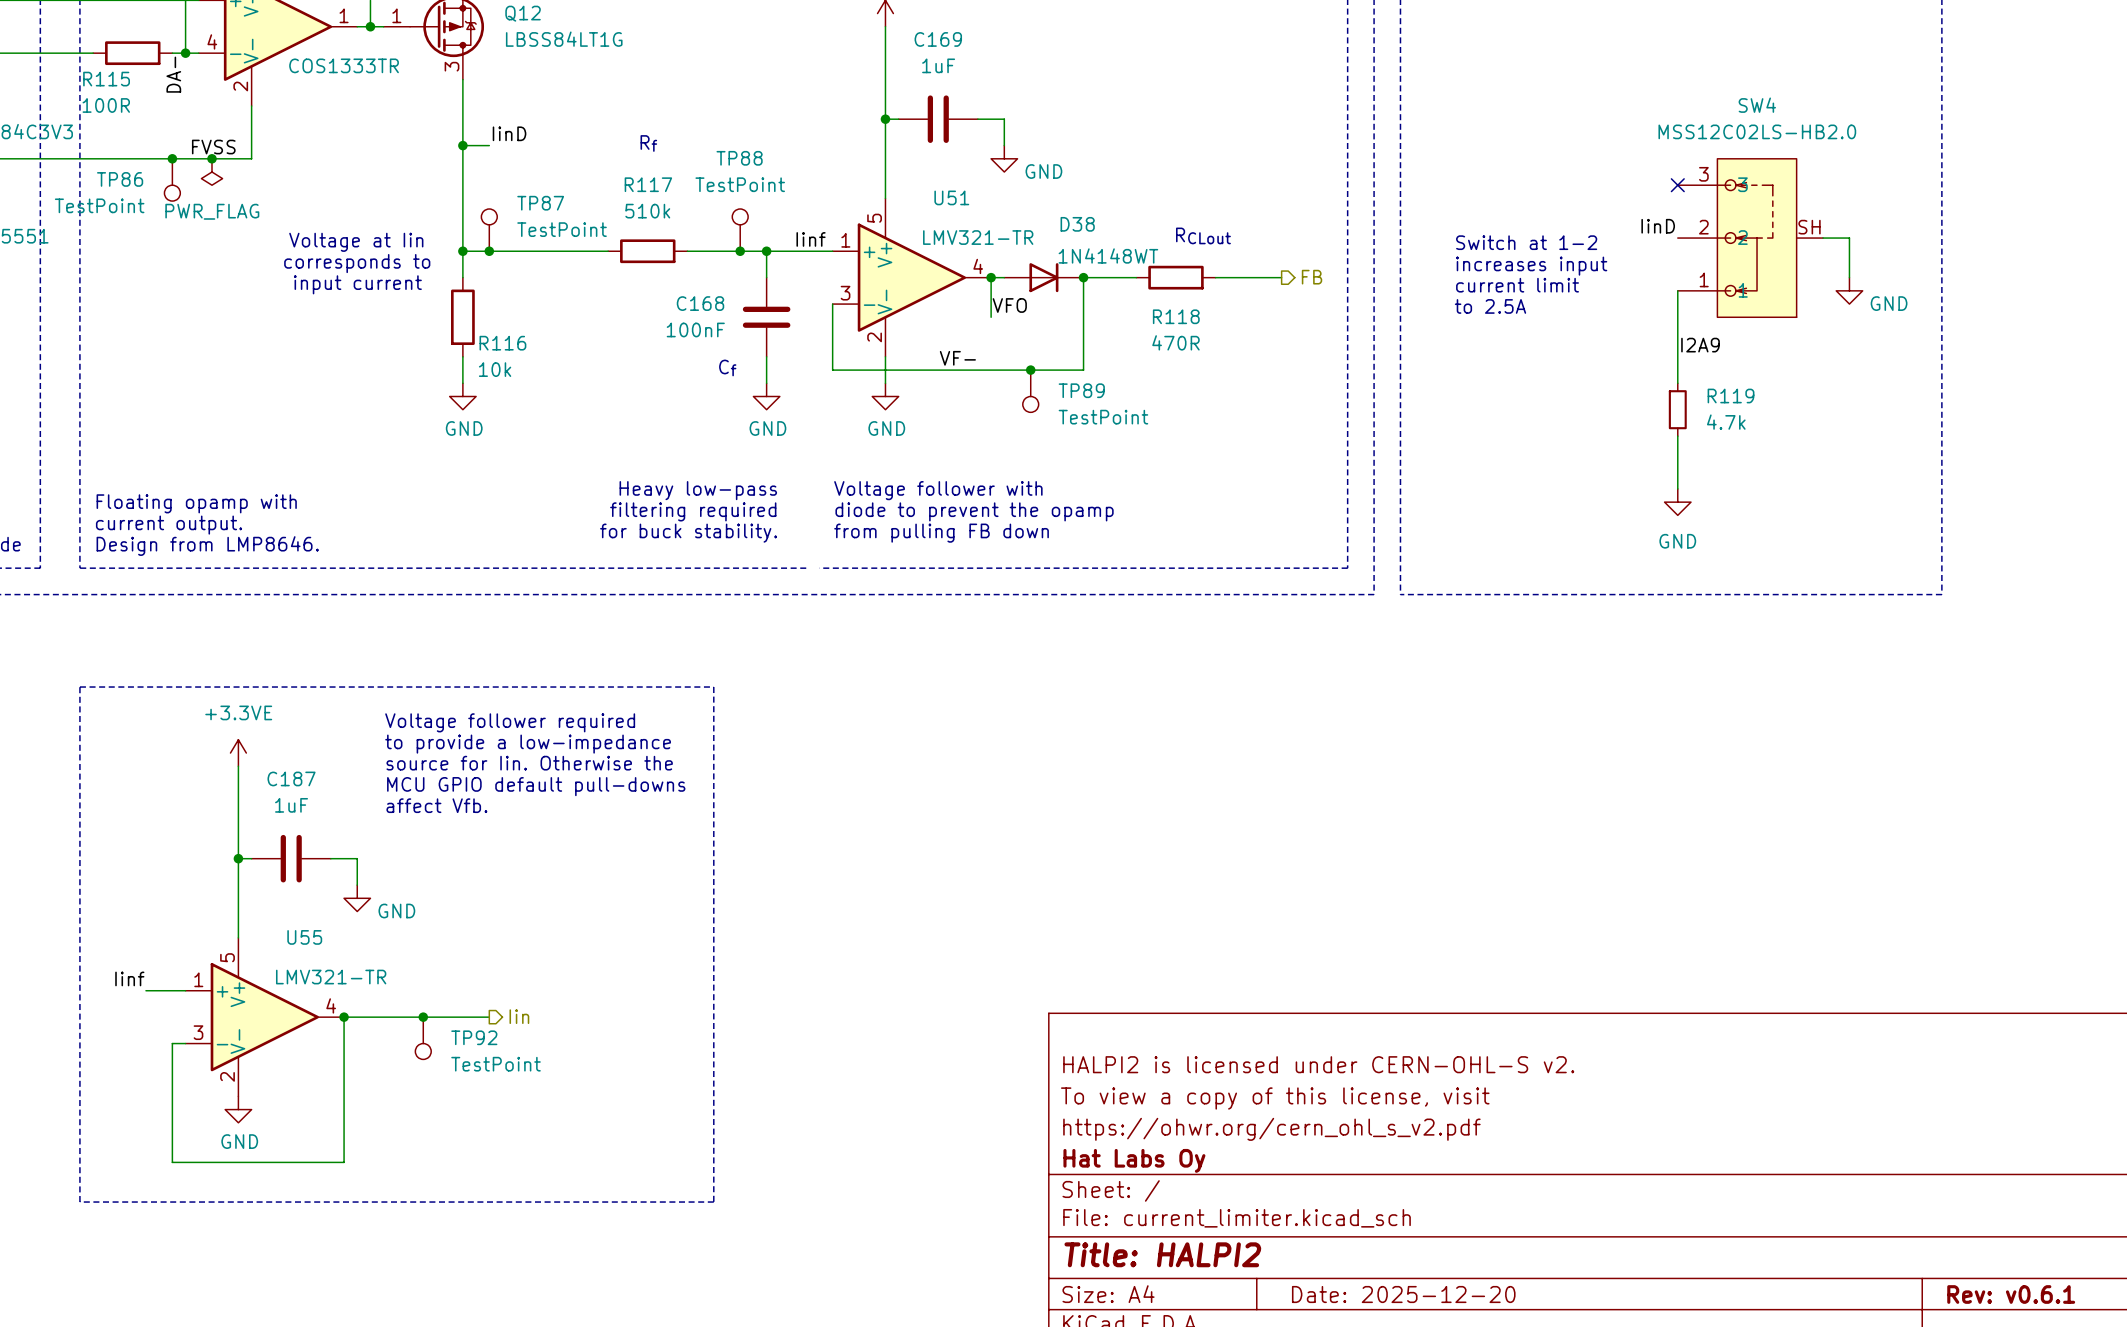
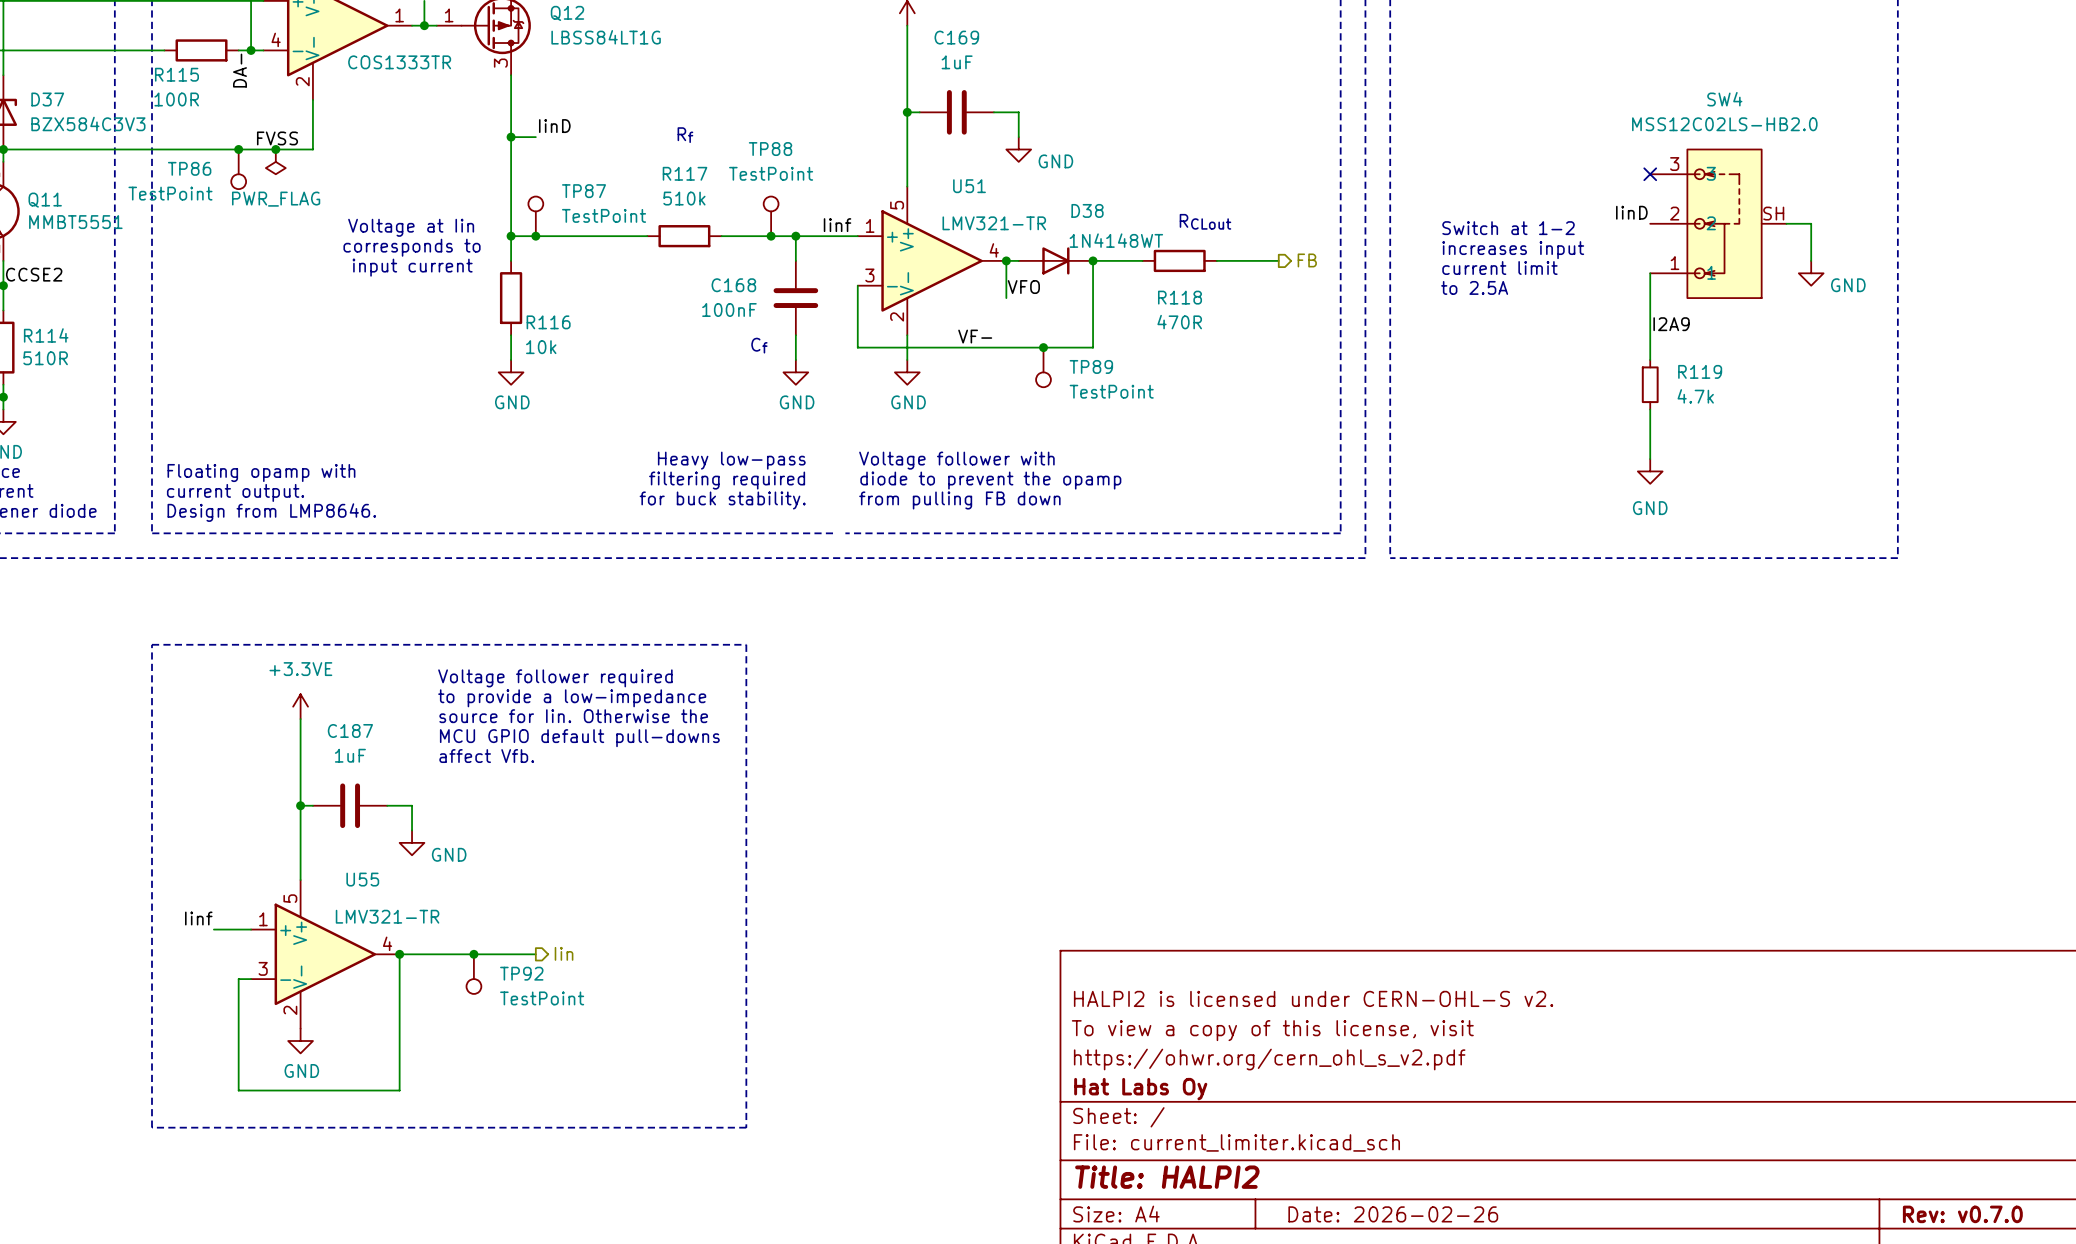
title block: Date: 2025-12-20 (1403, 1294) -> Date: 2026-02-26 (1393, 1214)
title block: Rev: v0.6.1 (2011, 1294) -> Rev: v0.7.0 (1962, 1214)

